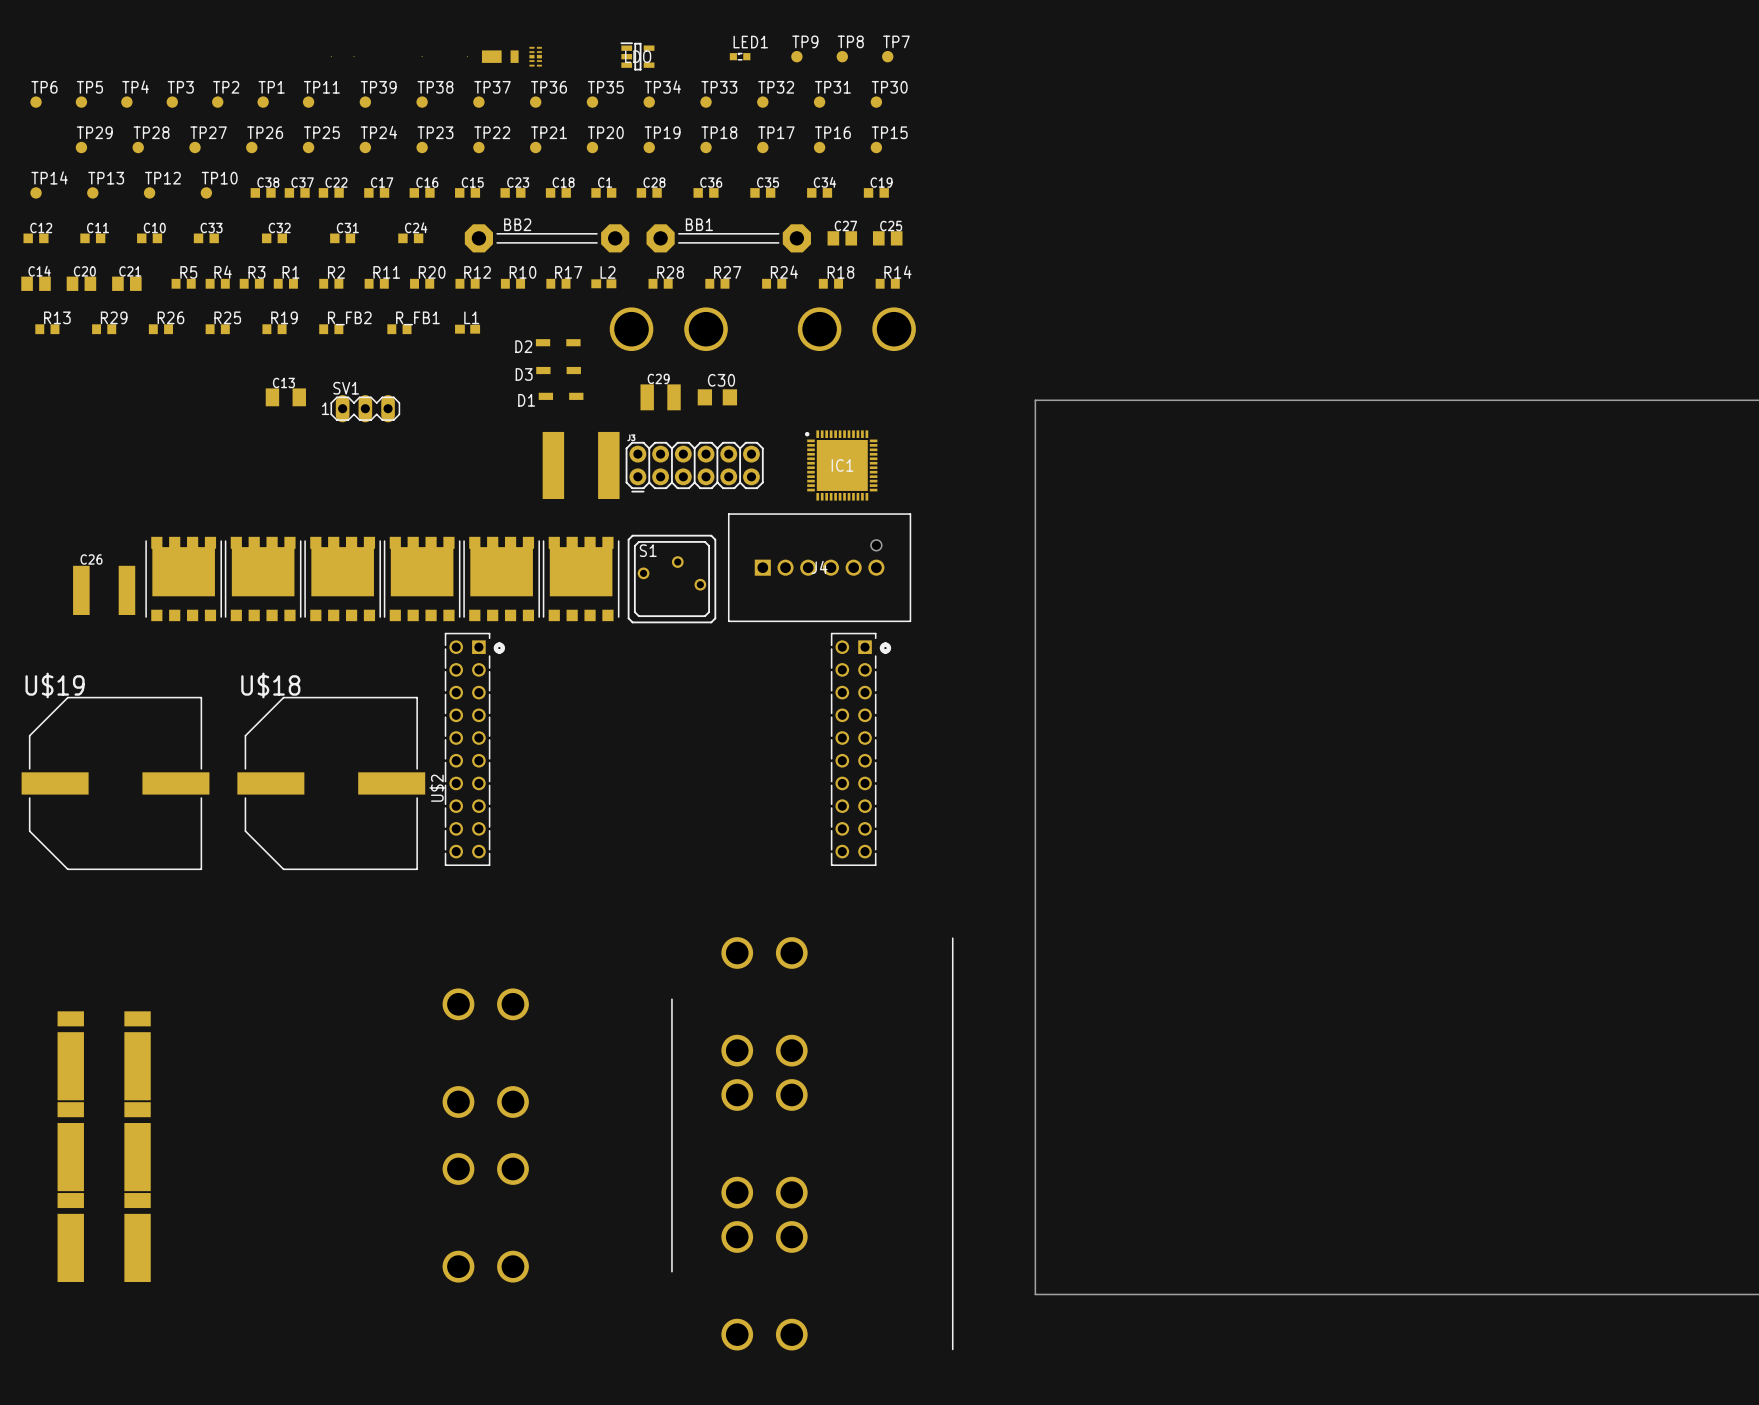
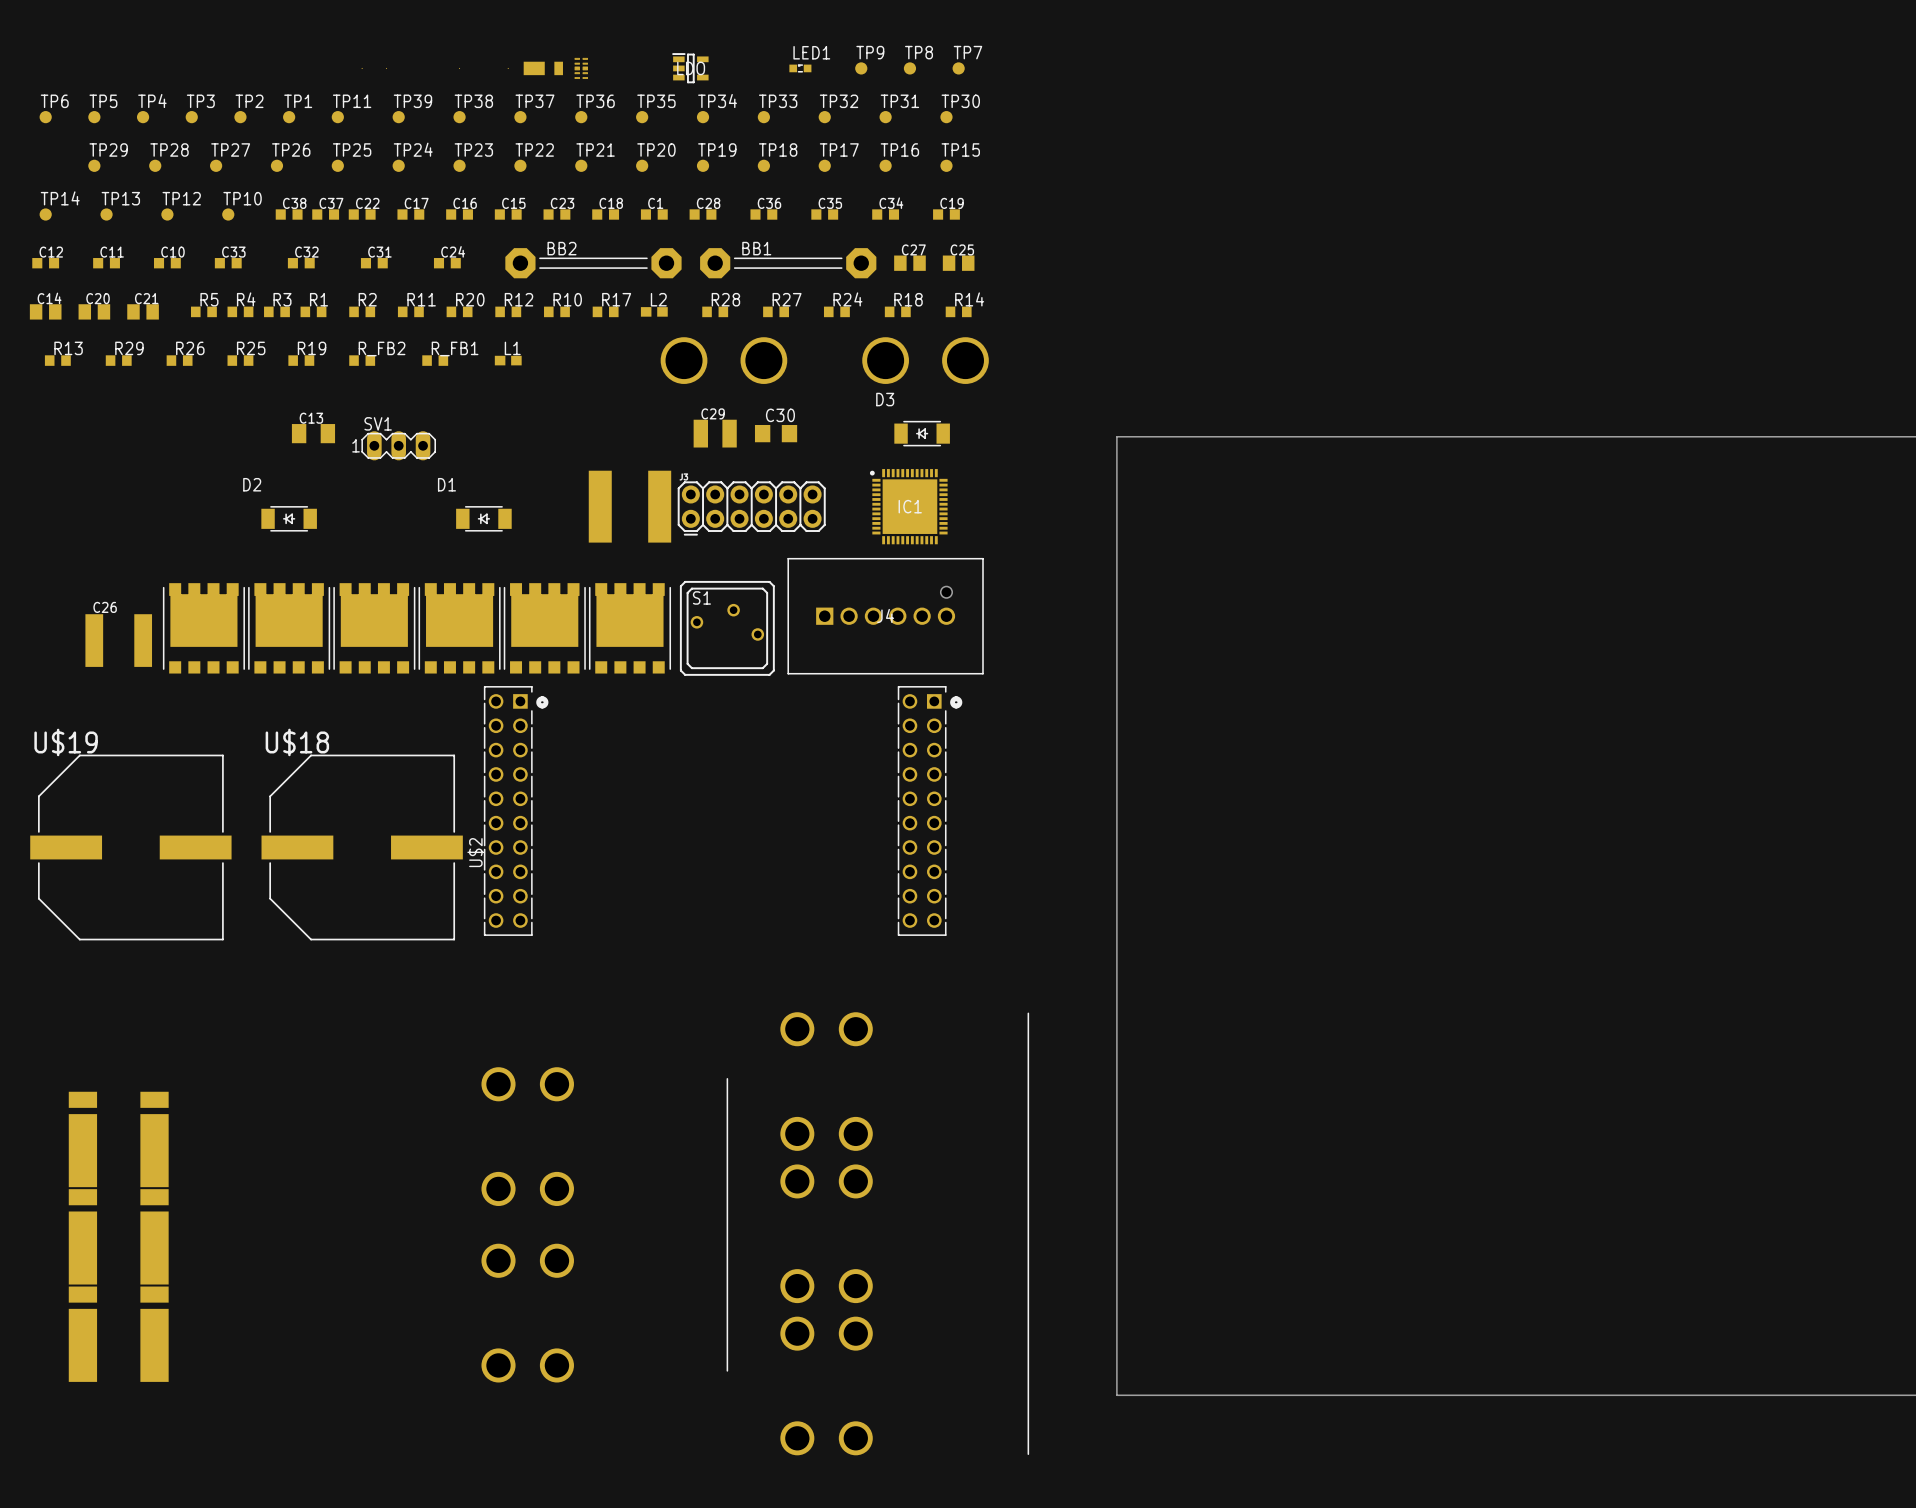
D2 footprint: [535, 339, 581, 347] -> [261, 506, 317, 532]
D2 name position: D2 (523, 346) -> D2 (252, 484)
D3 footprint: [536, 366, 581, 375] -> [894, 421, 950, 447]
D3 name position: D3 (524, 374) -> D3 (885, 399)
D1 footprint: [538, 392, 584, 400] -> [456, 506, 512, 532]
D1 name position: D1 (526, 400) -> D1 (446, 484)

